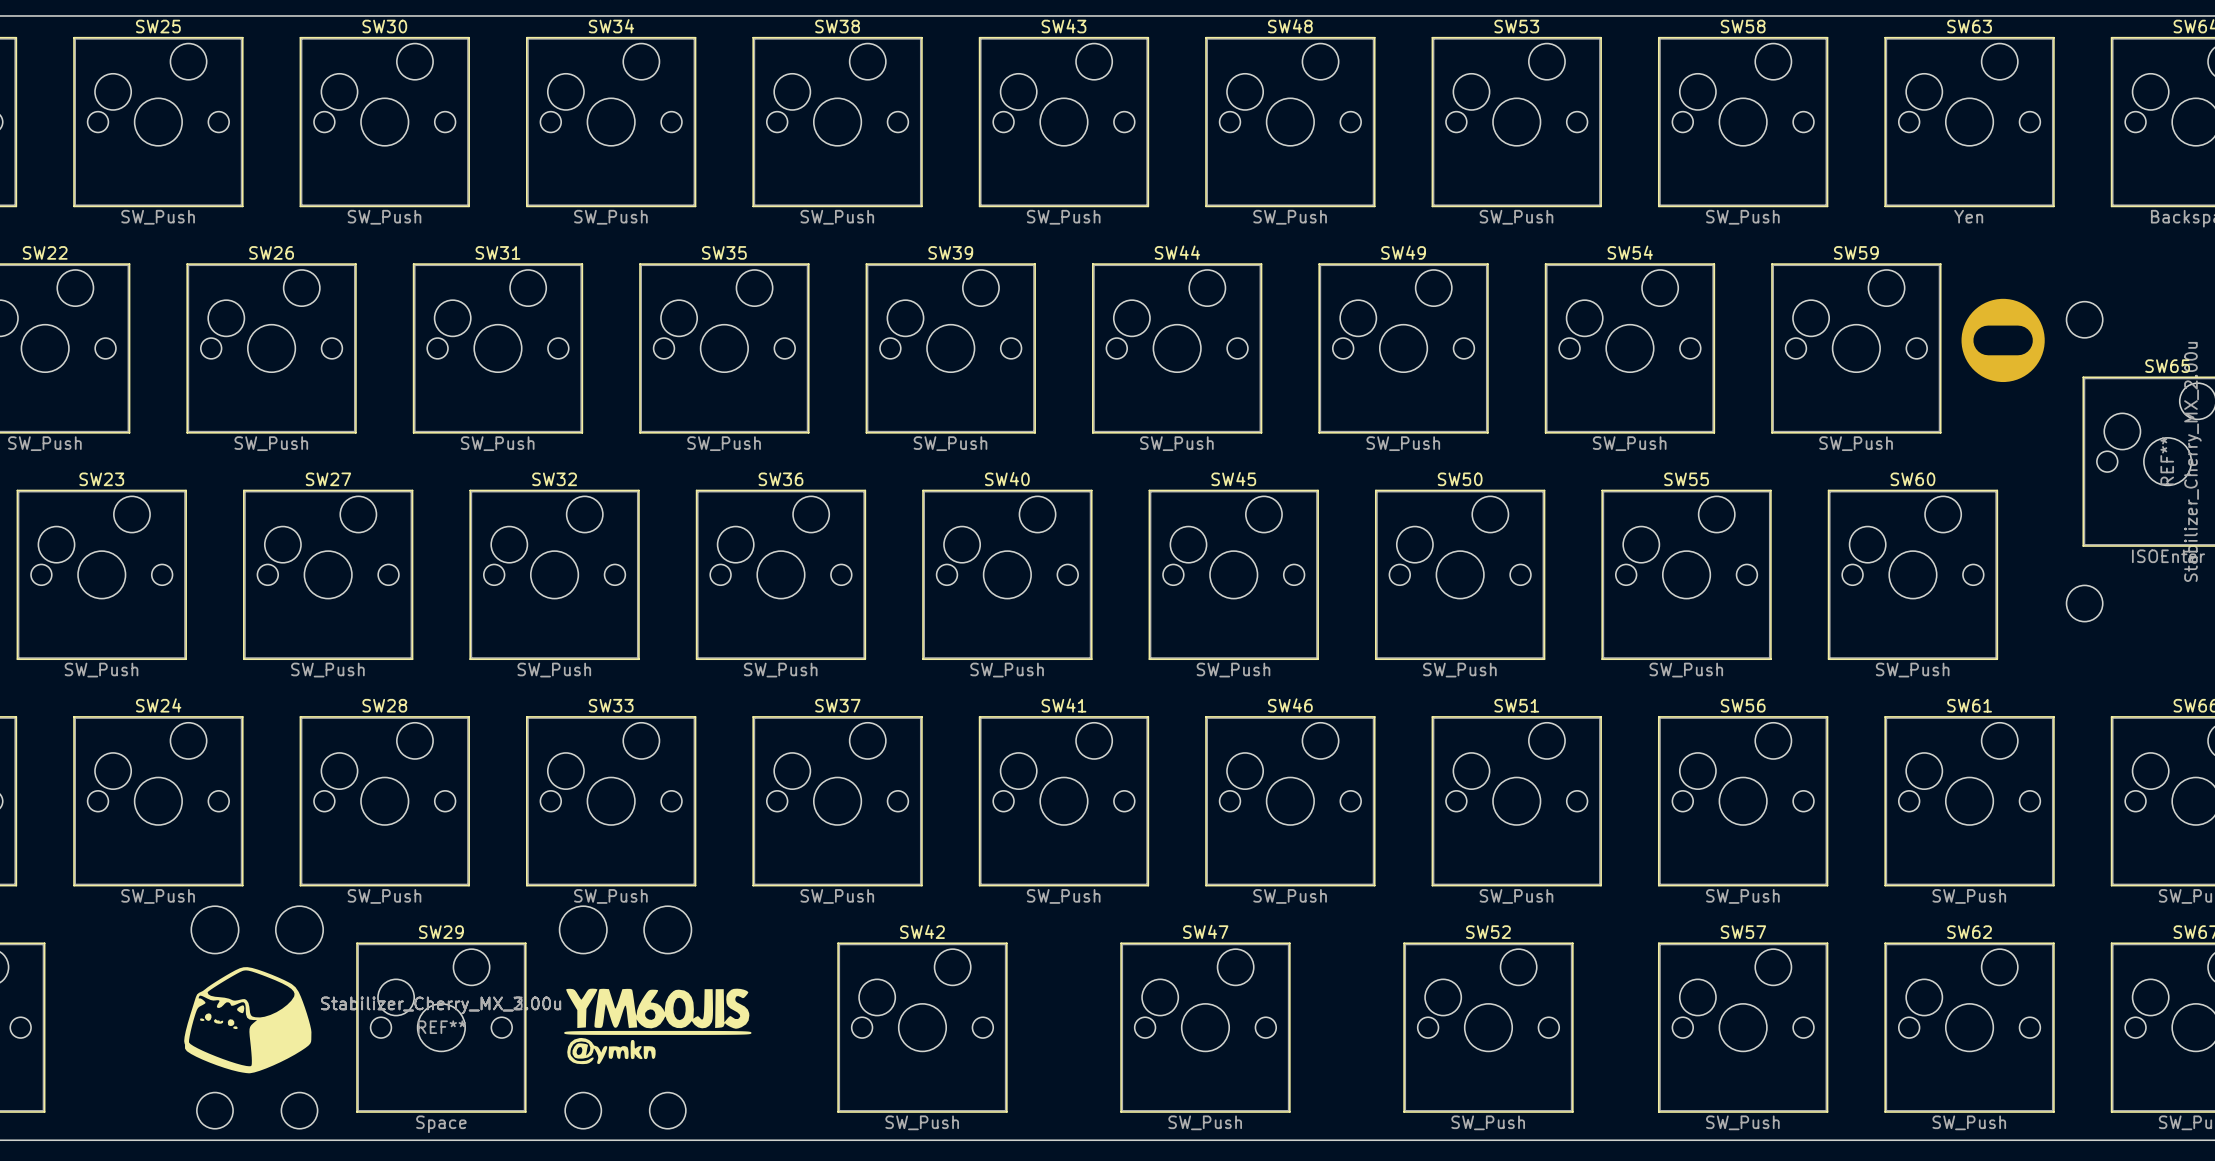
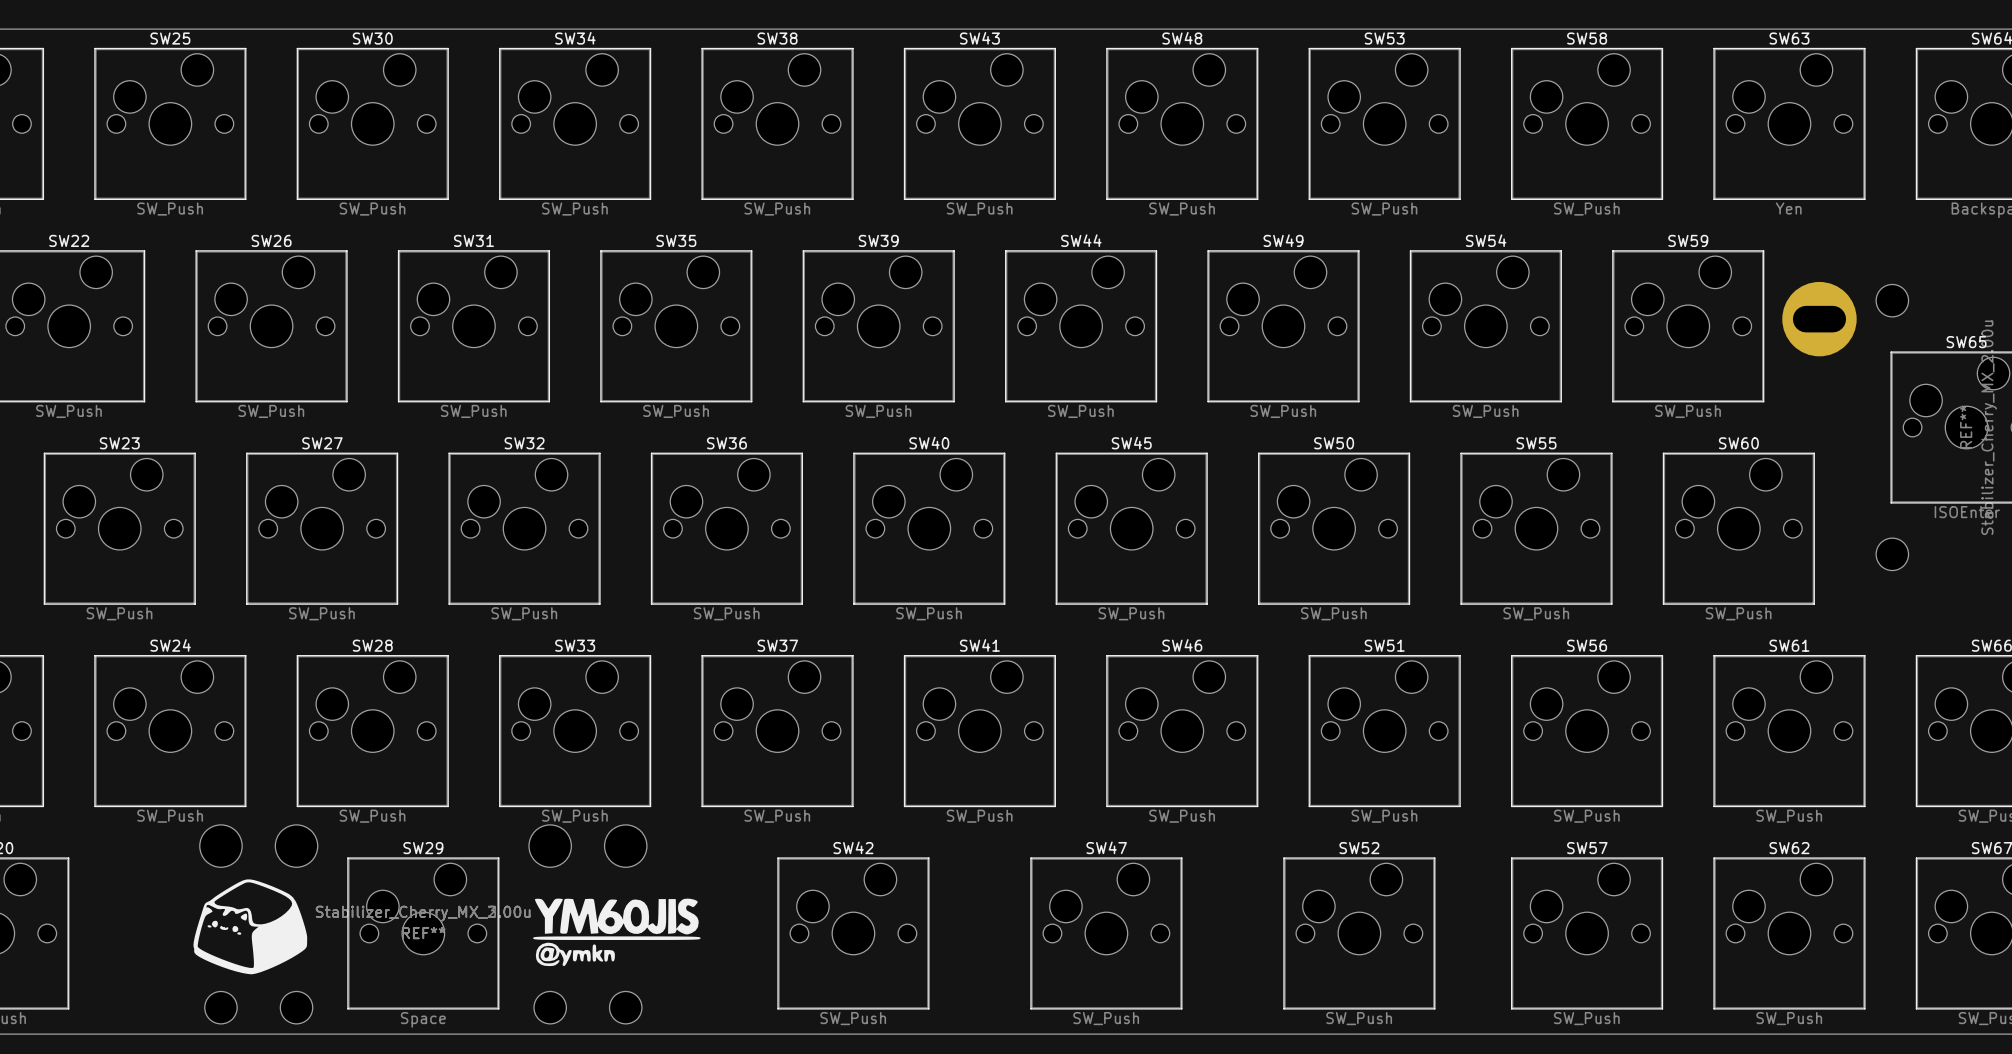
REF** name: none -> REF** (423, 933)

